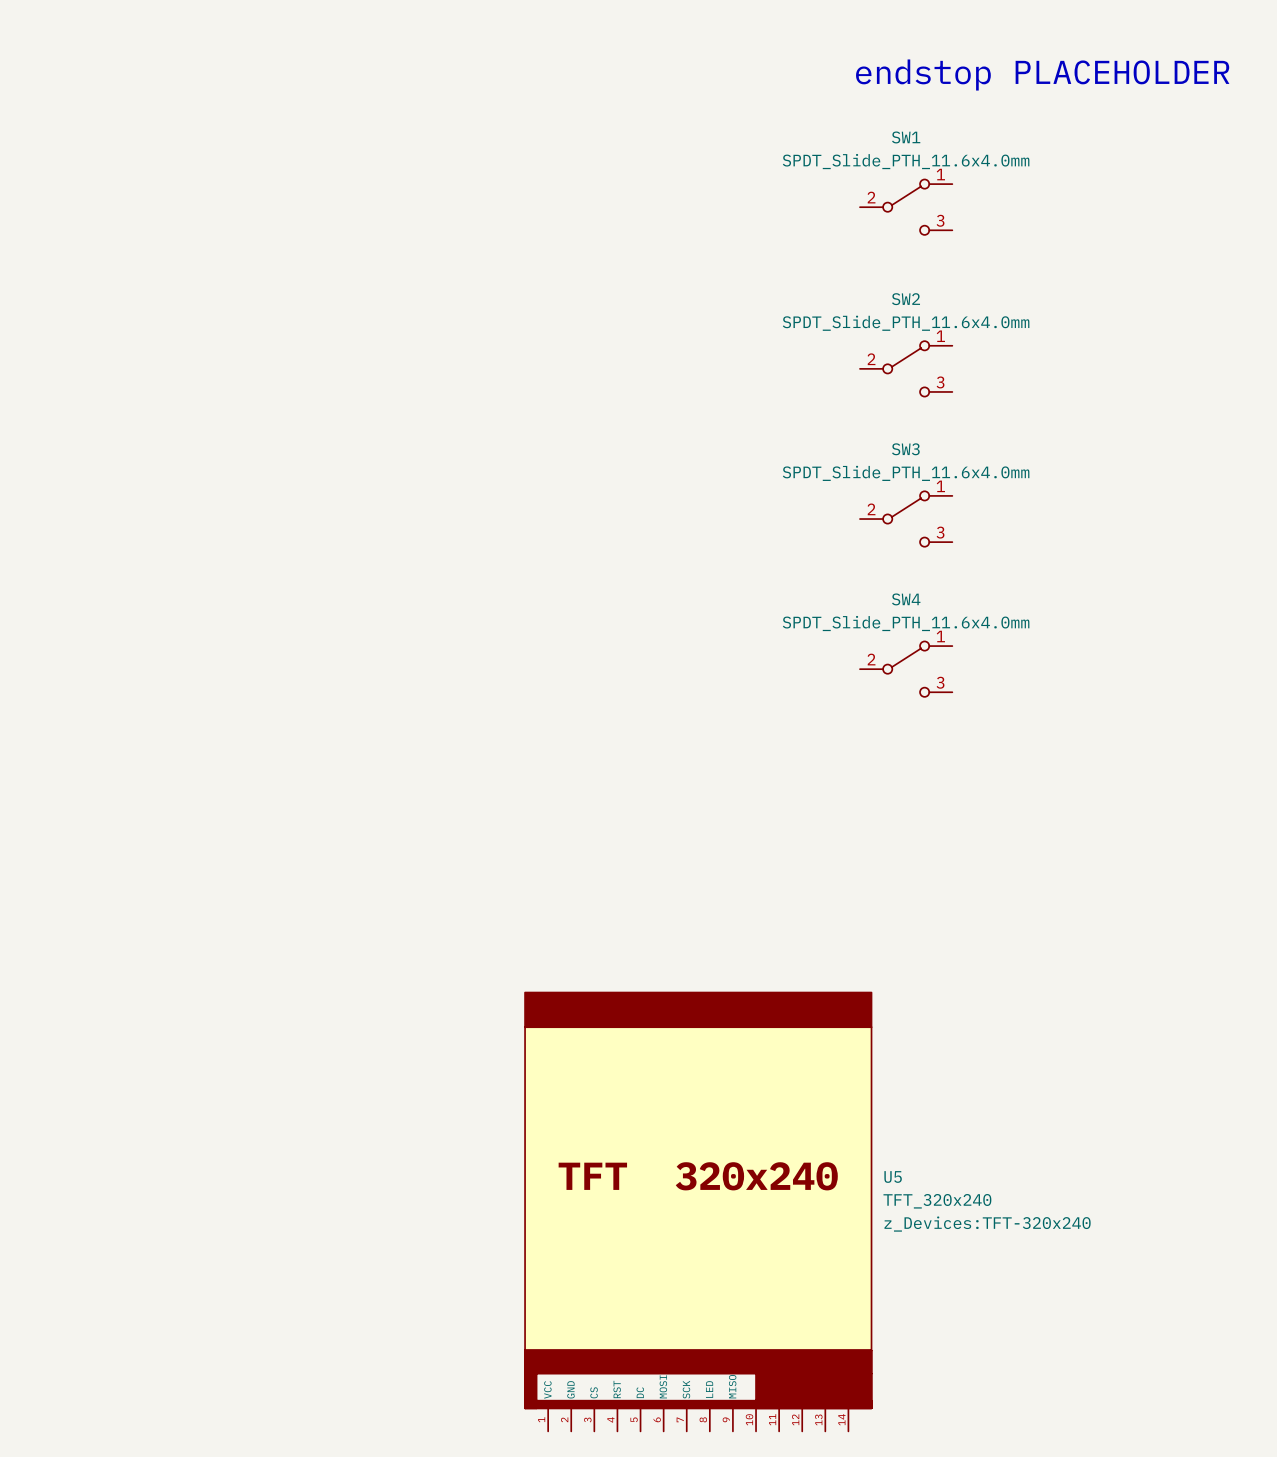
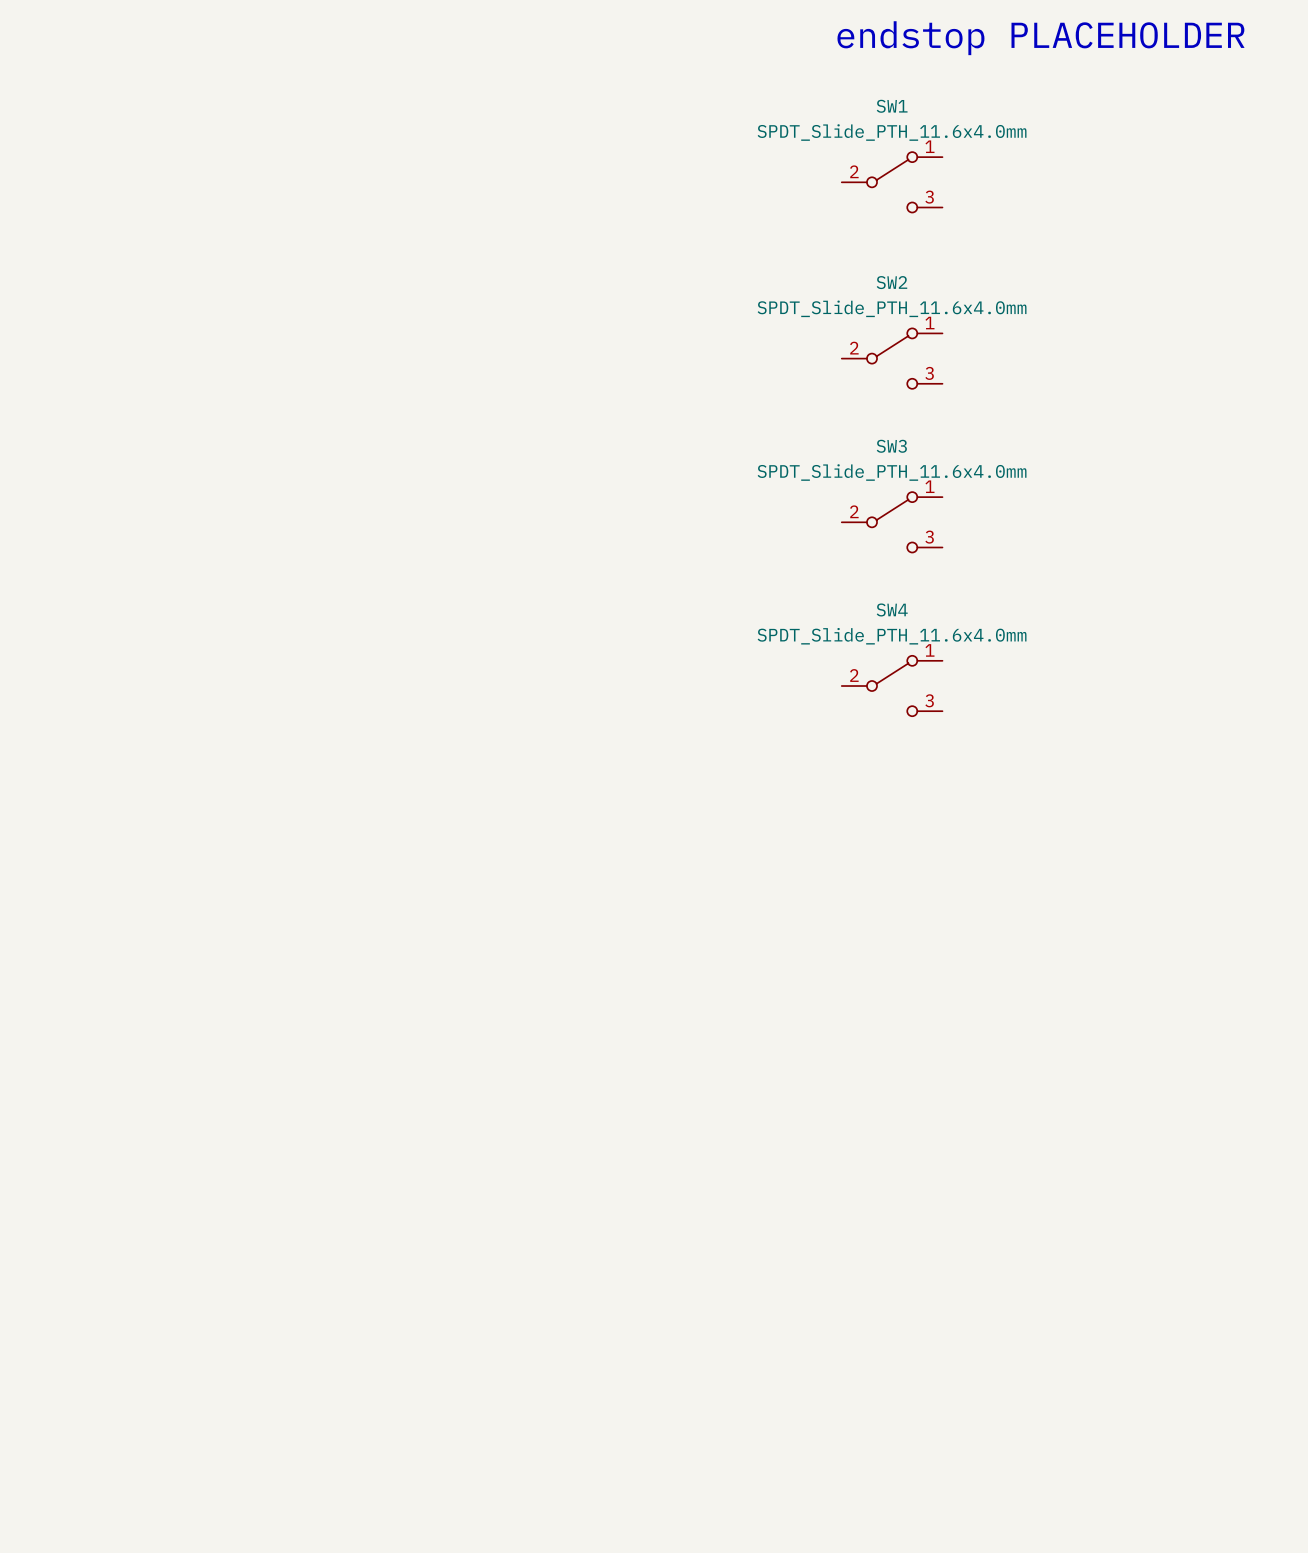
U5: TFT_320x240 (698, 1211) -> none

